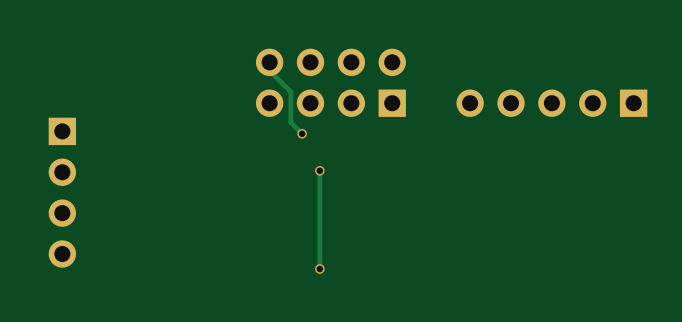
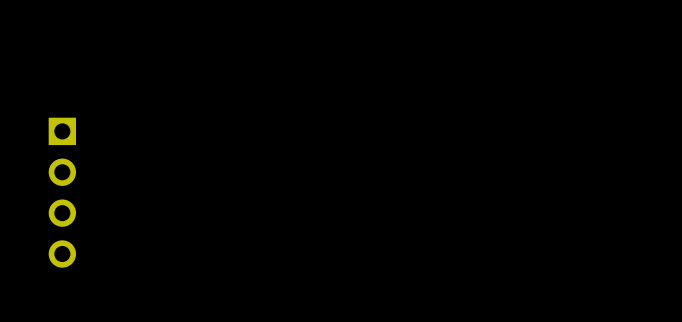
track: (269, 62) (269, 70) (290, 91) (290, 122) (302, 133) -> none
part: (330, 82) -> none
part: (551, 103) -> none
via: (302, 133) -> none
track: (319, 170) (319, 268) -> none
via: (319, 170) -> none
via: (319, 268) -> none

